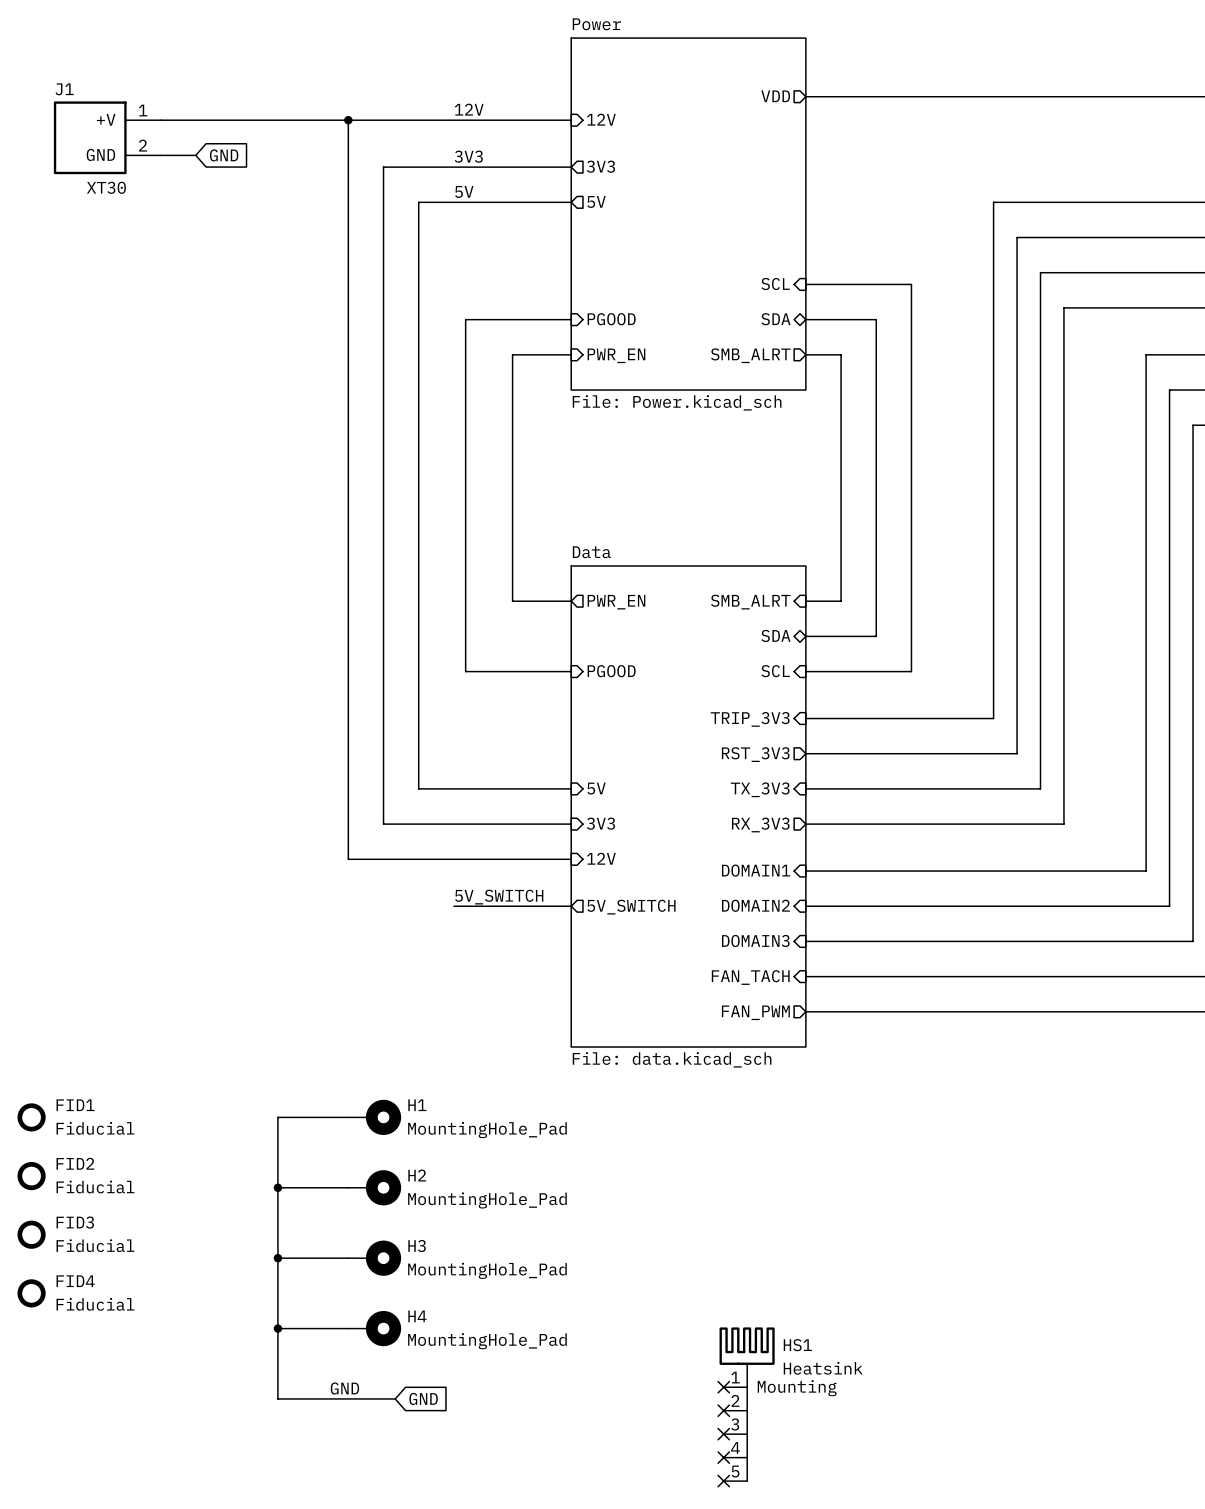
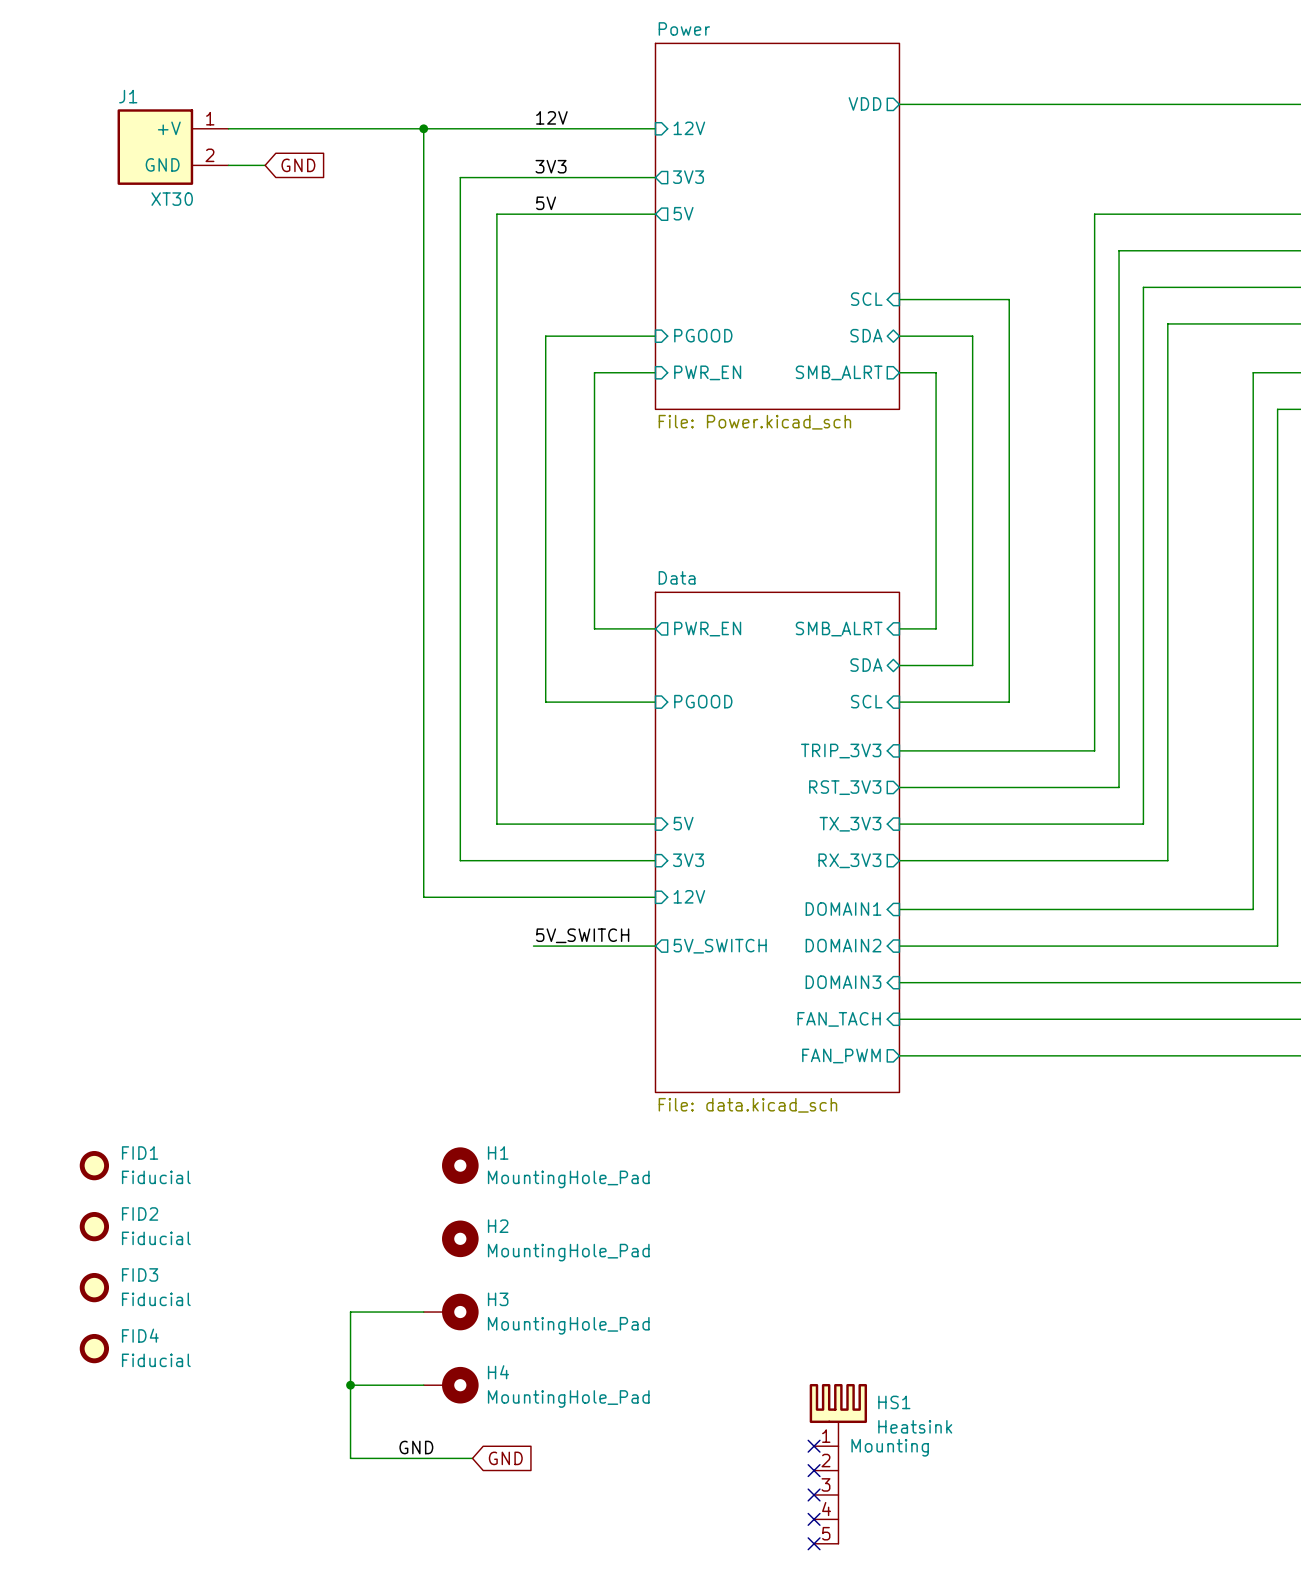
H1 symbol: [348, 1099, 402, 1136] -> [442, 1147, 479, 1184]
wire: (348, 1117) (277, 1117) (277, 1258) -> none
H2 symbol: [348, 1170, 402, 1206] -> [442, 1220, 479, 1258]
wire: (277, 1187) (348, 1187) -> none
junction: (277, 1187) -> none
junction: (277, 1258) -> none

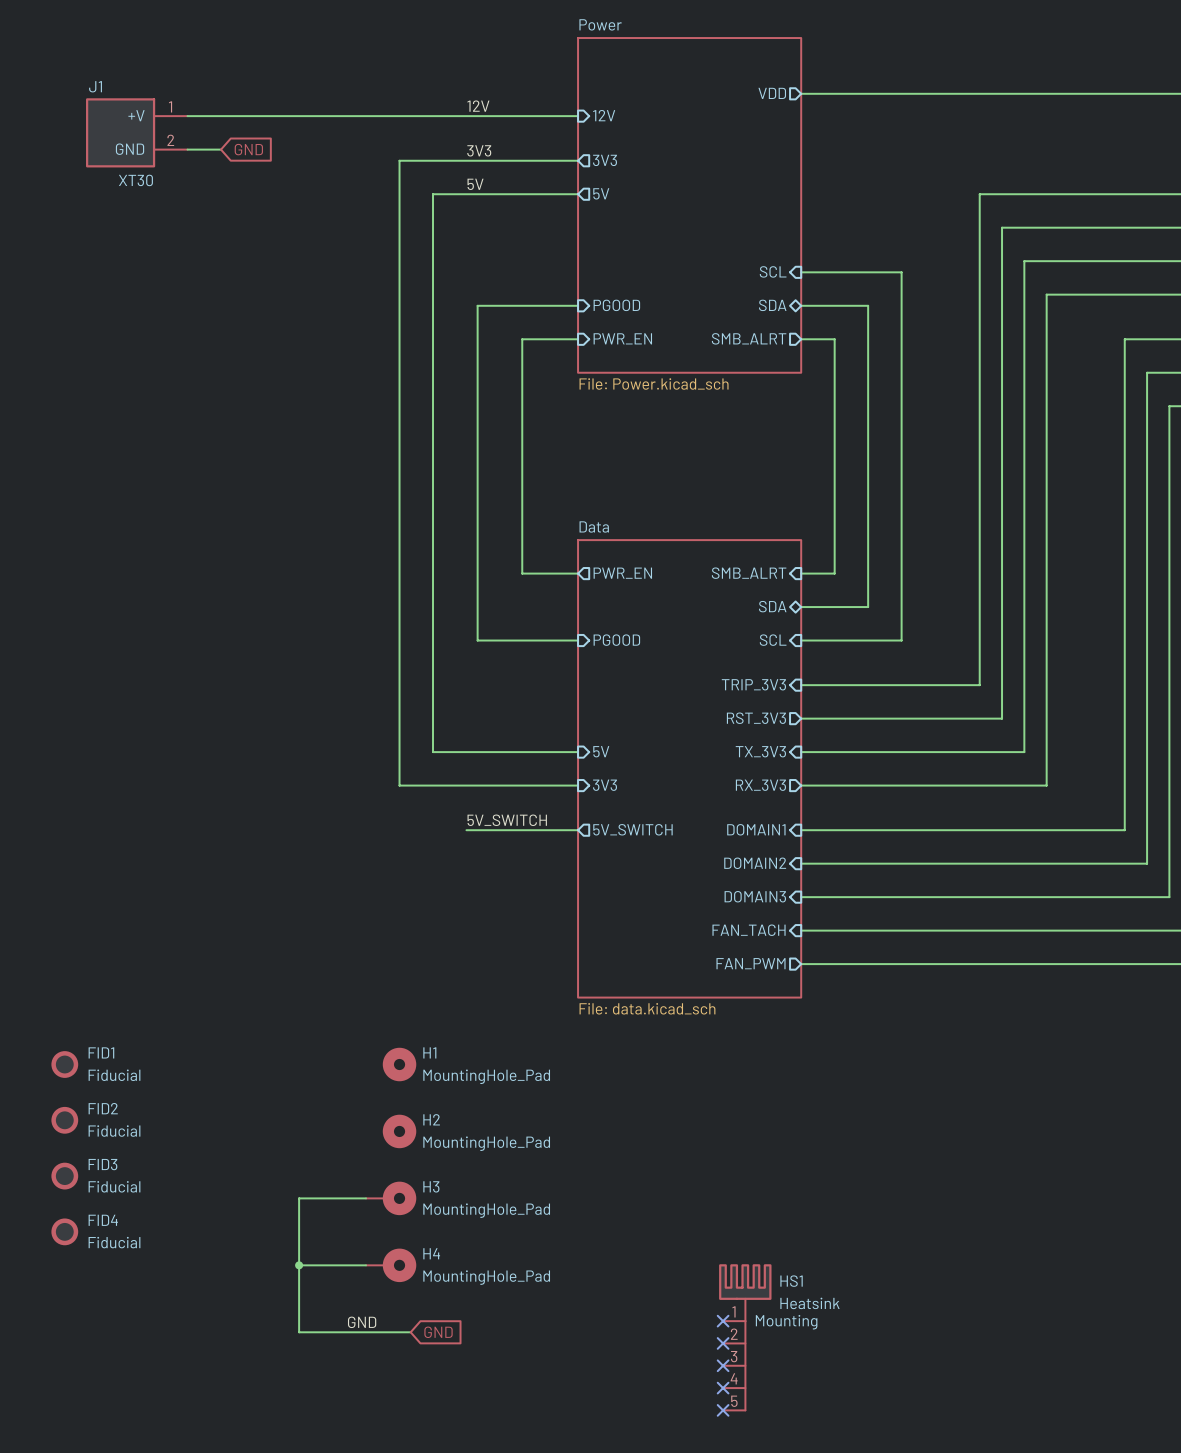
wire: (423, 128) (423, 897) (655, 897) -> none
junction: (423, 128) -> none
sheet pin: 12V (689, 896) -> none
label position: 5V_SWITCH (582, 935) -> 5V_SWITCH (507, 820)
wire: (533, 946) (655, 946) -> (466, 830) (578, 830)
sheet pin position: 5V_SWITCH (720, 946) -> 5V_SWITCH (632, 829)

